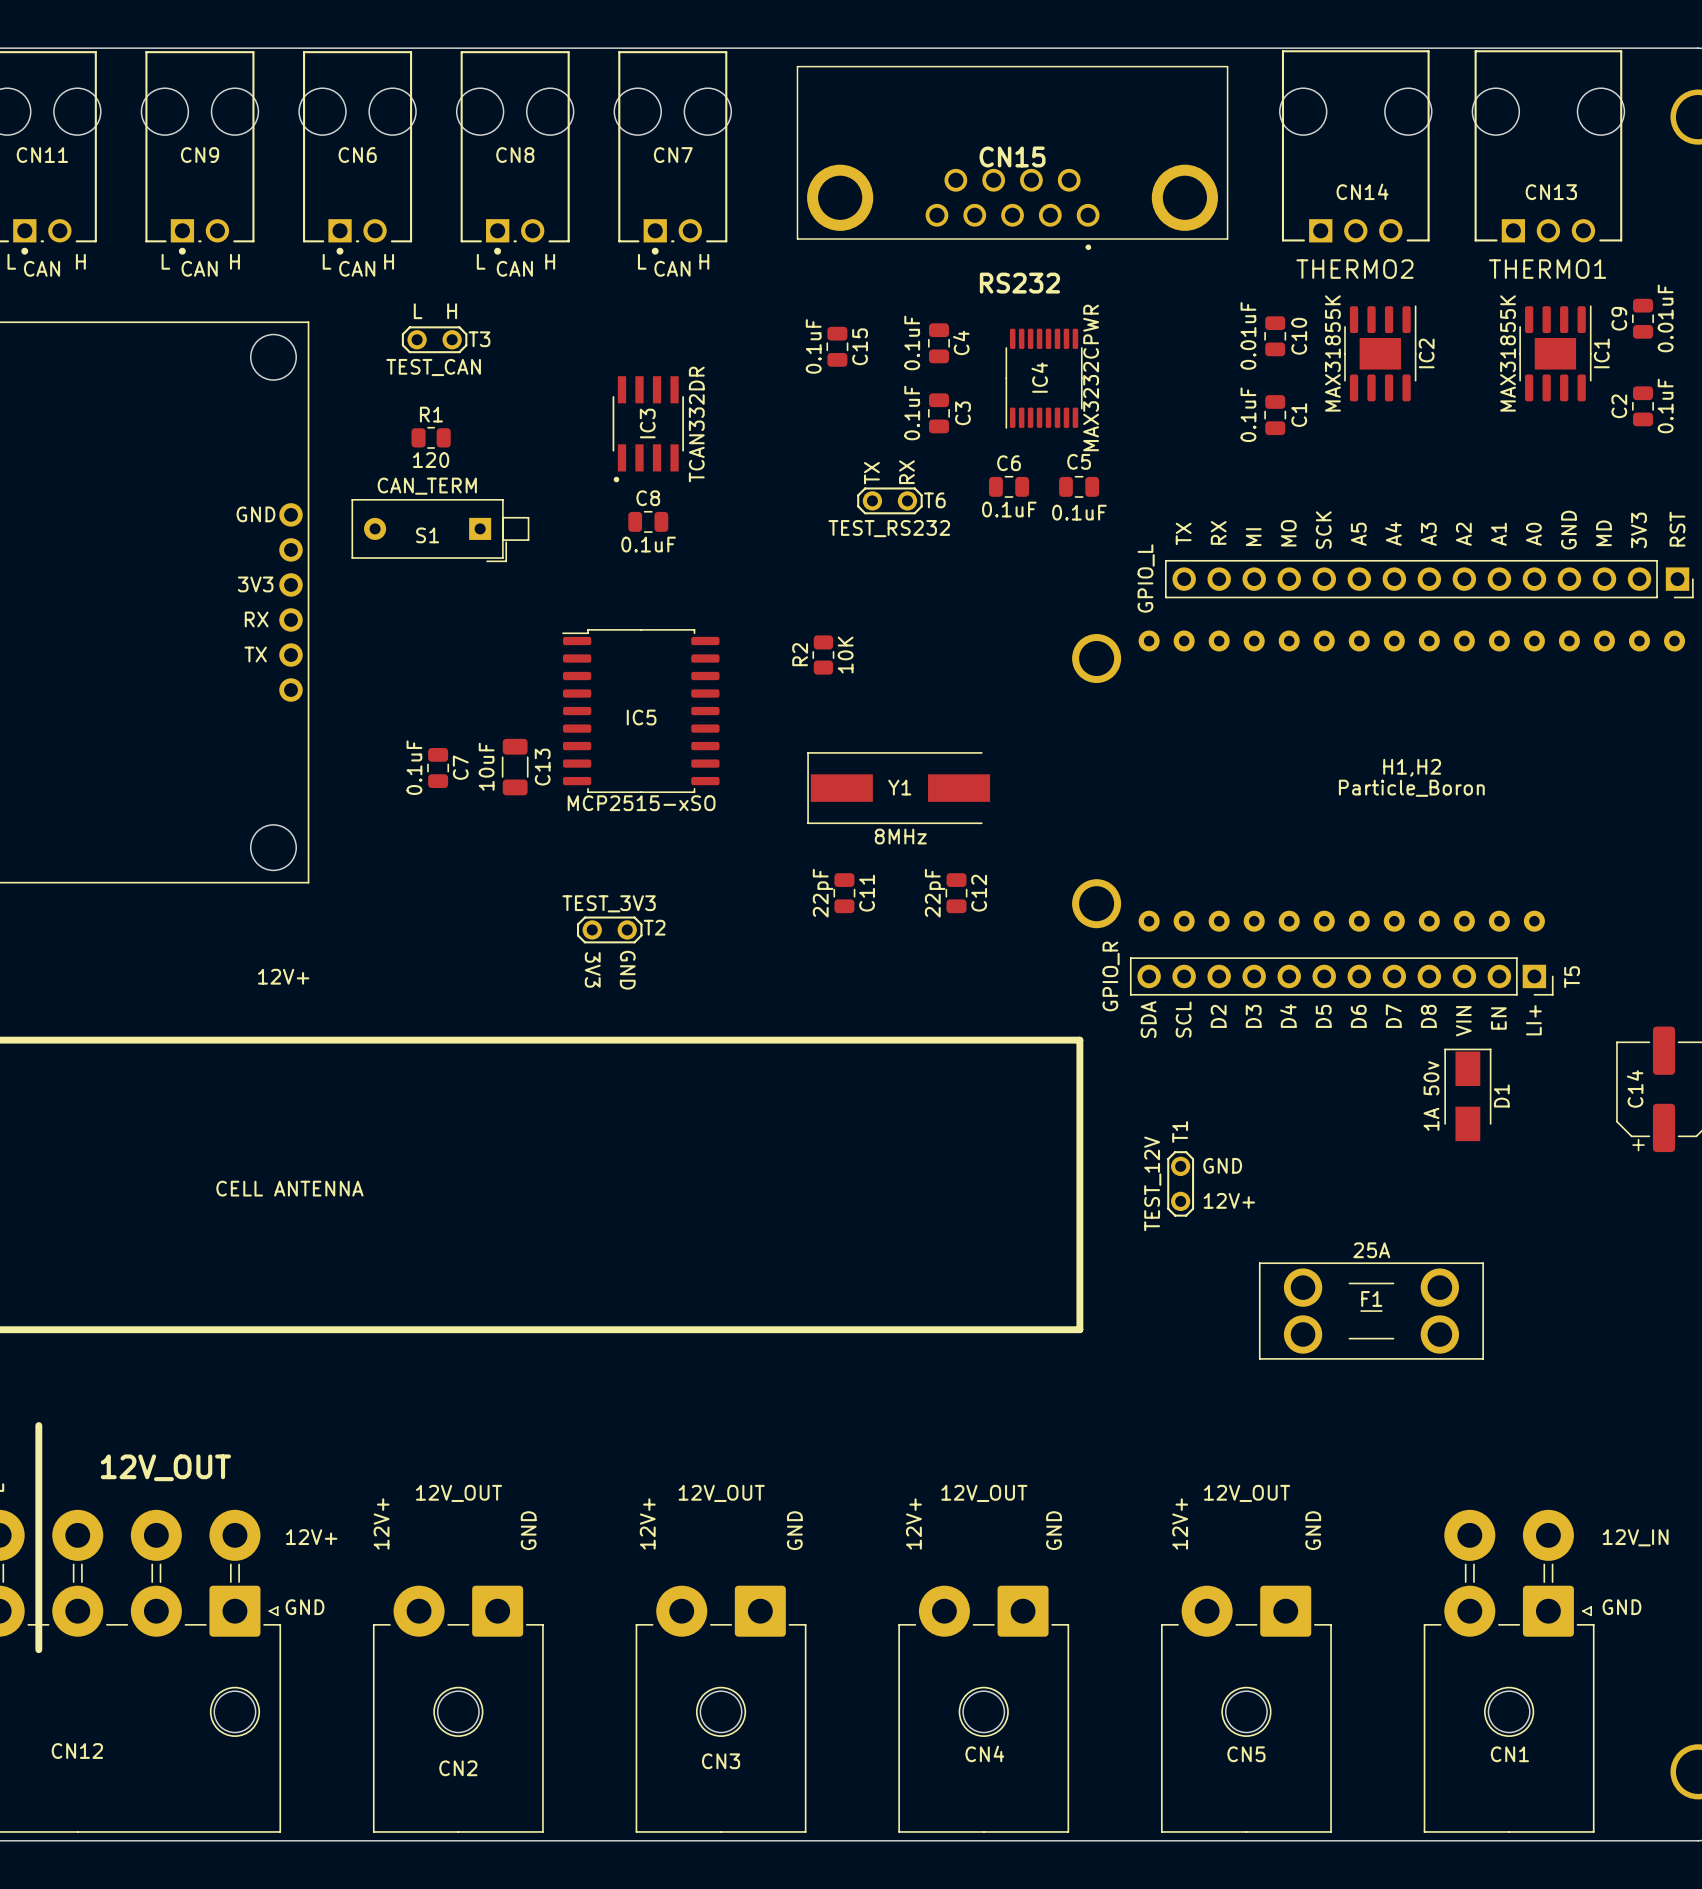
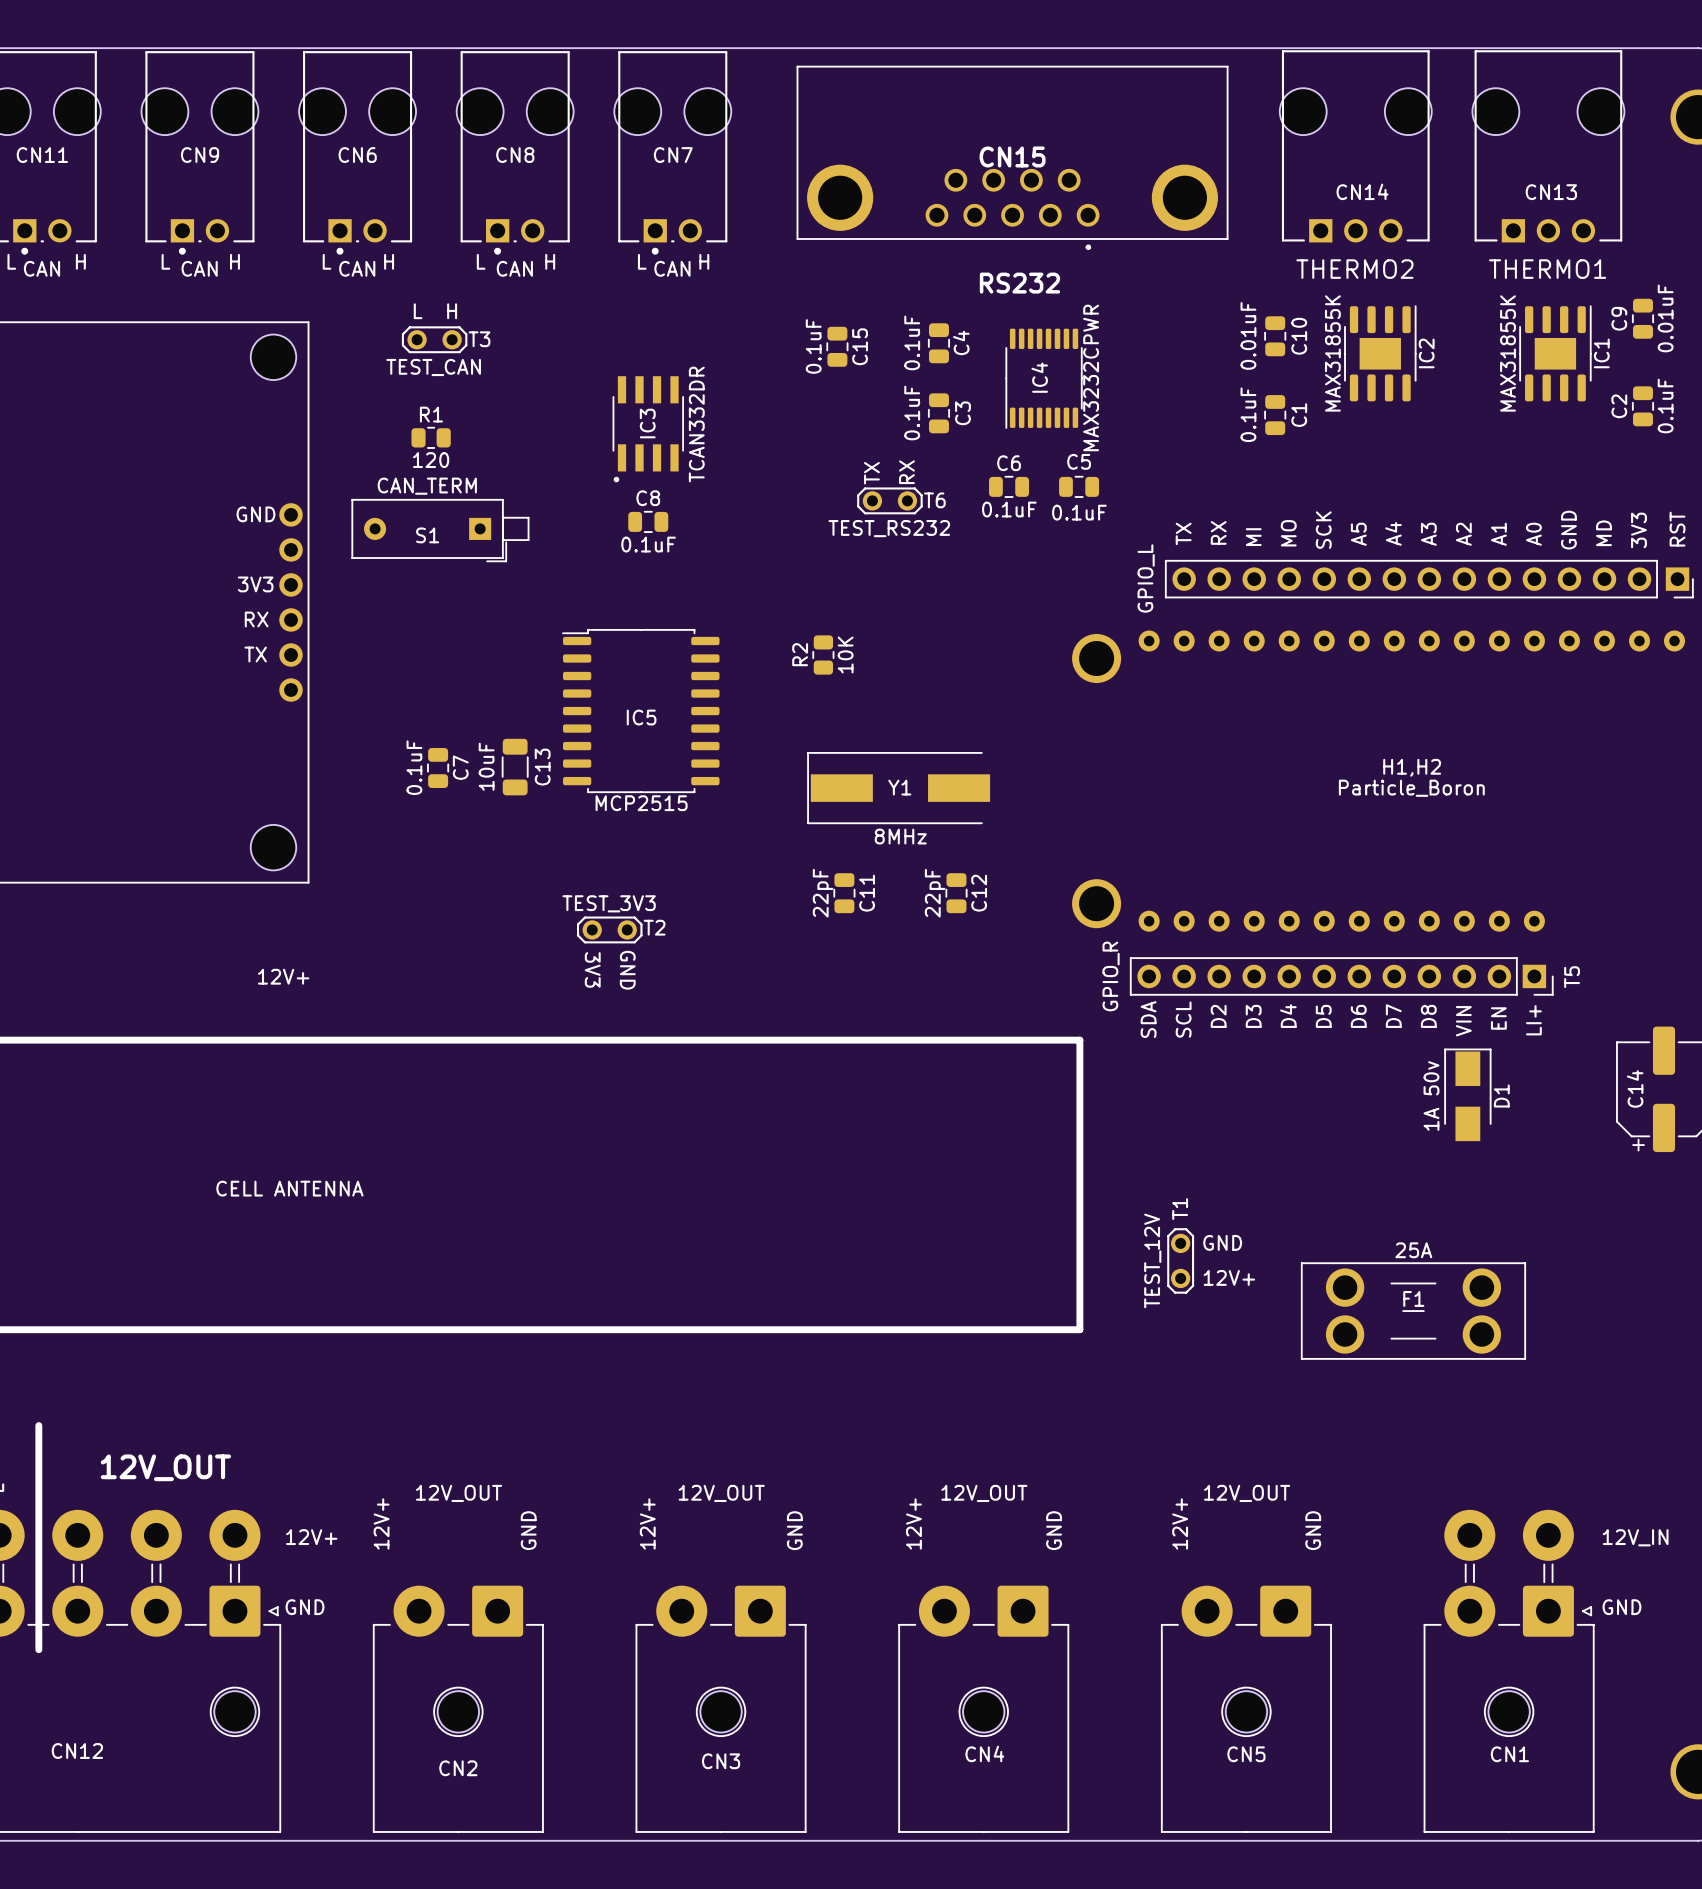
IC5 value: MCP2515-xSO (641, 803) -> MCP2515 (641, 803)
text position: GND (1222, 1165) -> GND (1222, 1242)
T1 position: (1180, 1183) -> (1180, 1260)
text position: 12V+ (1229, 1200) -> 12V+ (1229, 1277)
F1 position: (1371, 1311) -> (1413, 1311)

